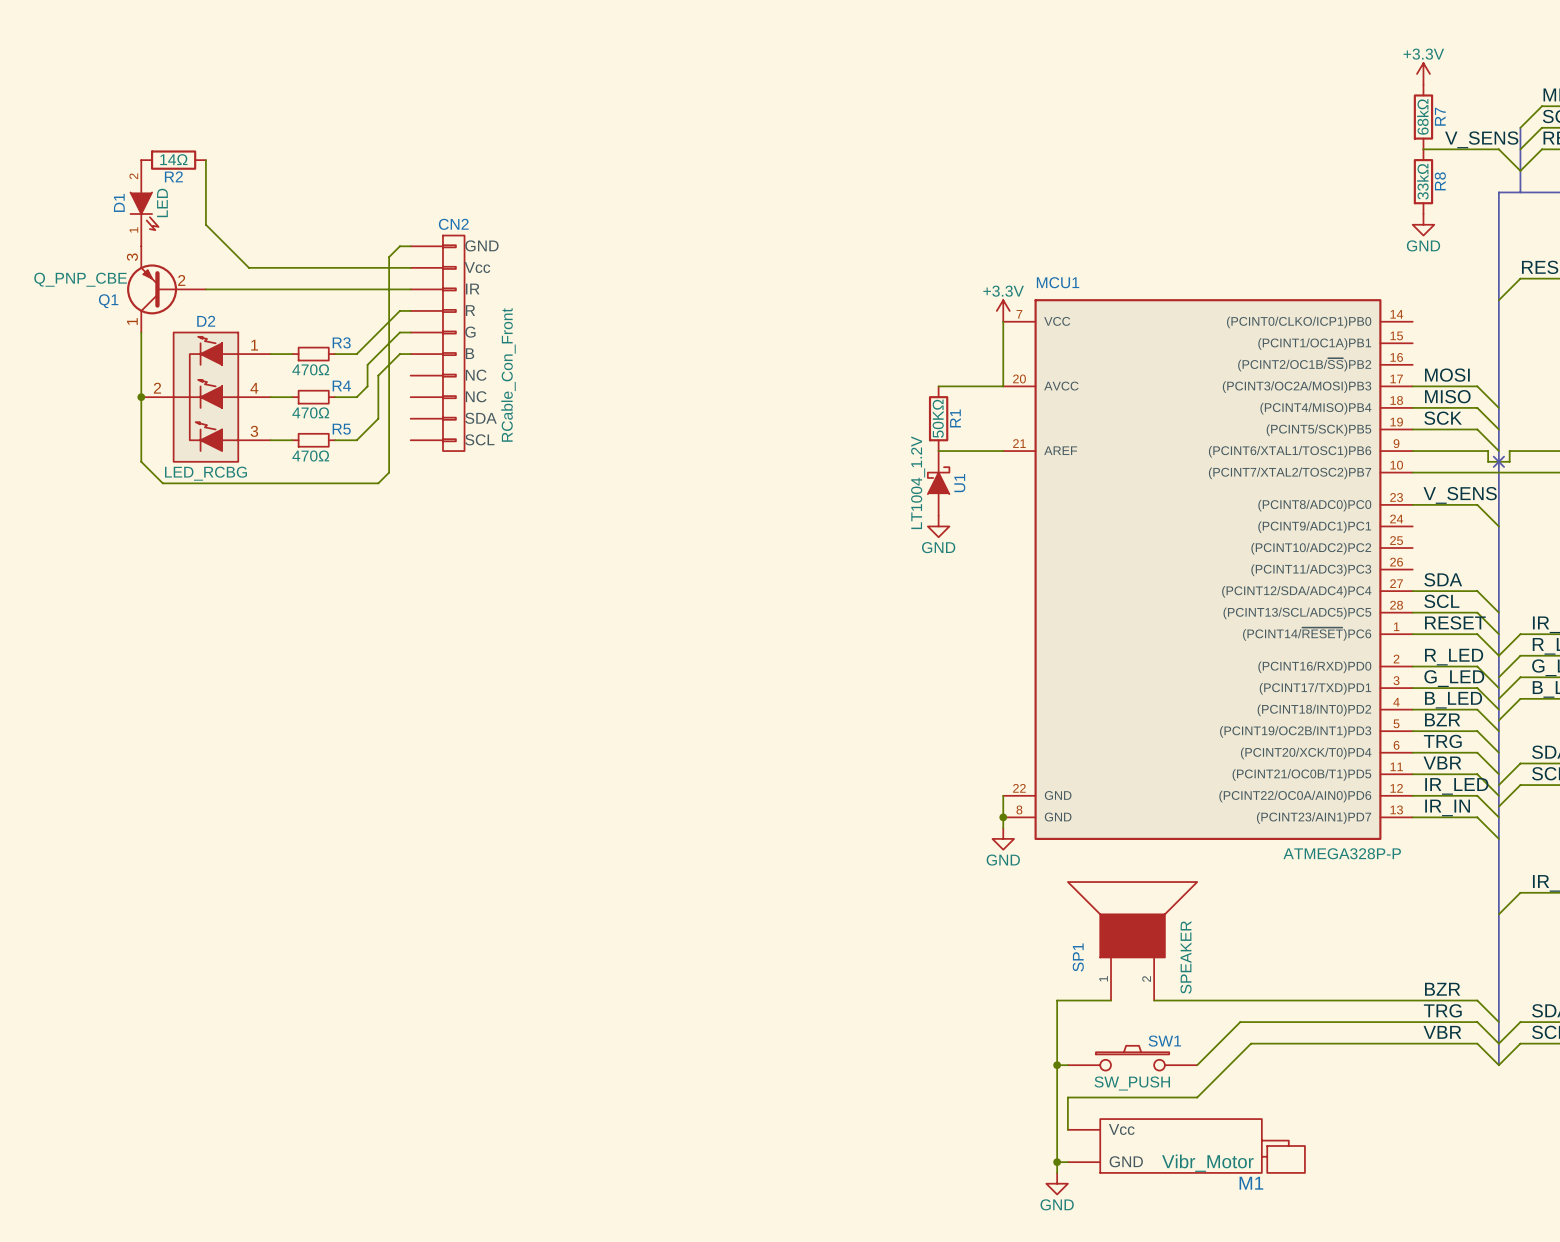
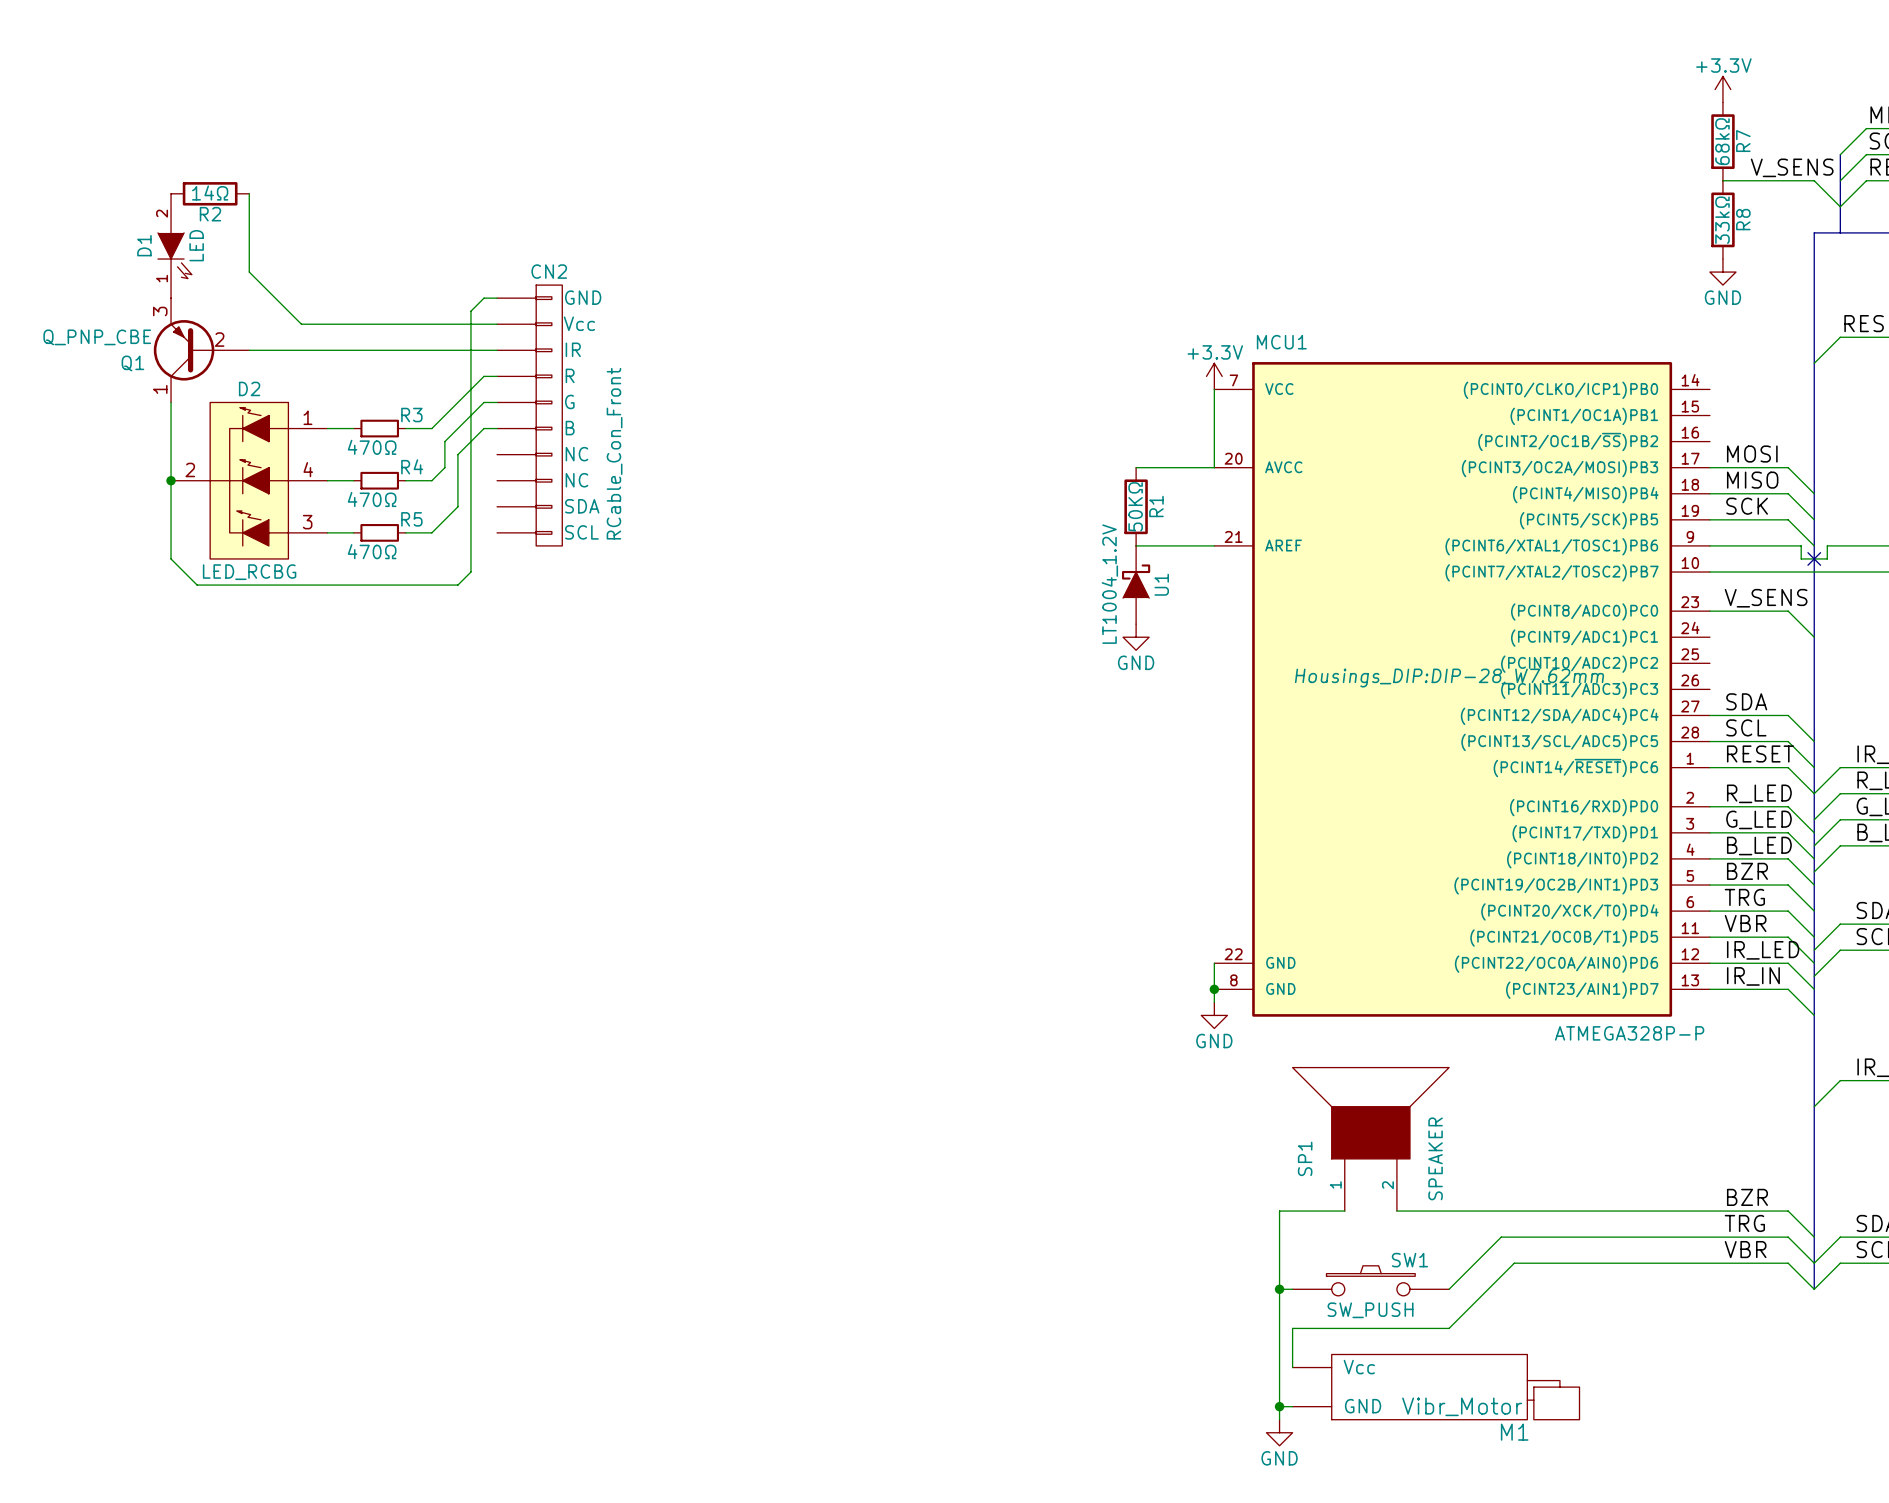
MCU1 text: none -> Housings_DIP:DIP-28_W7.62mm (1449, 678)

